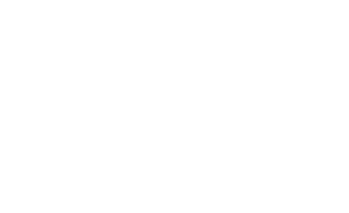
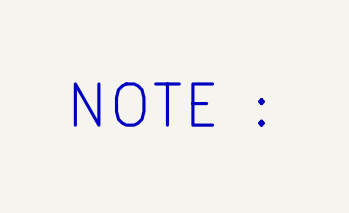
text: none -> NOTE : (169, 104)

